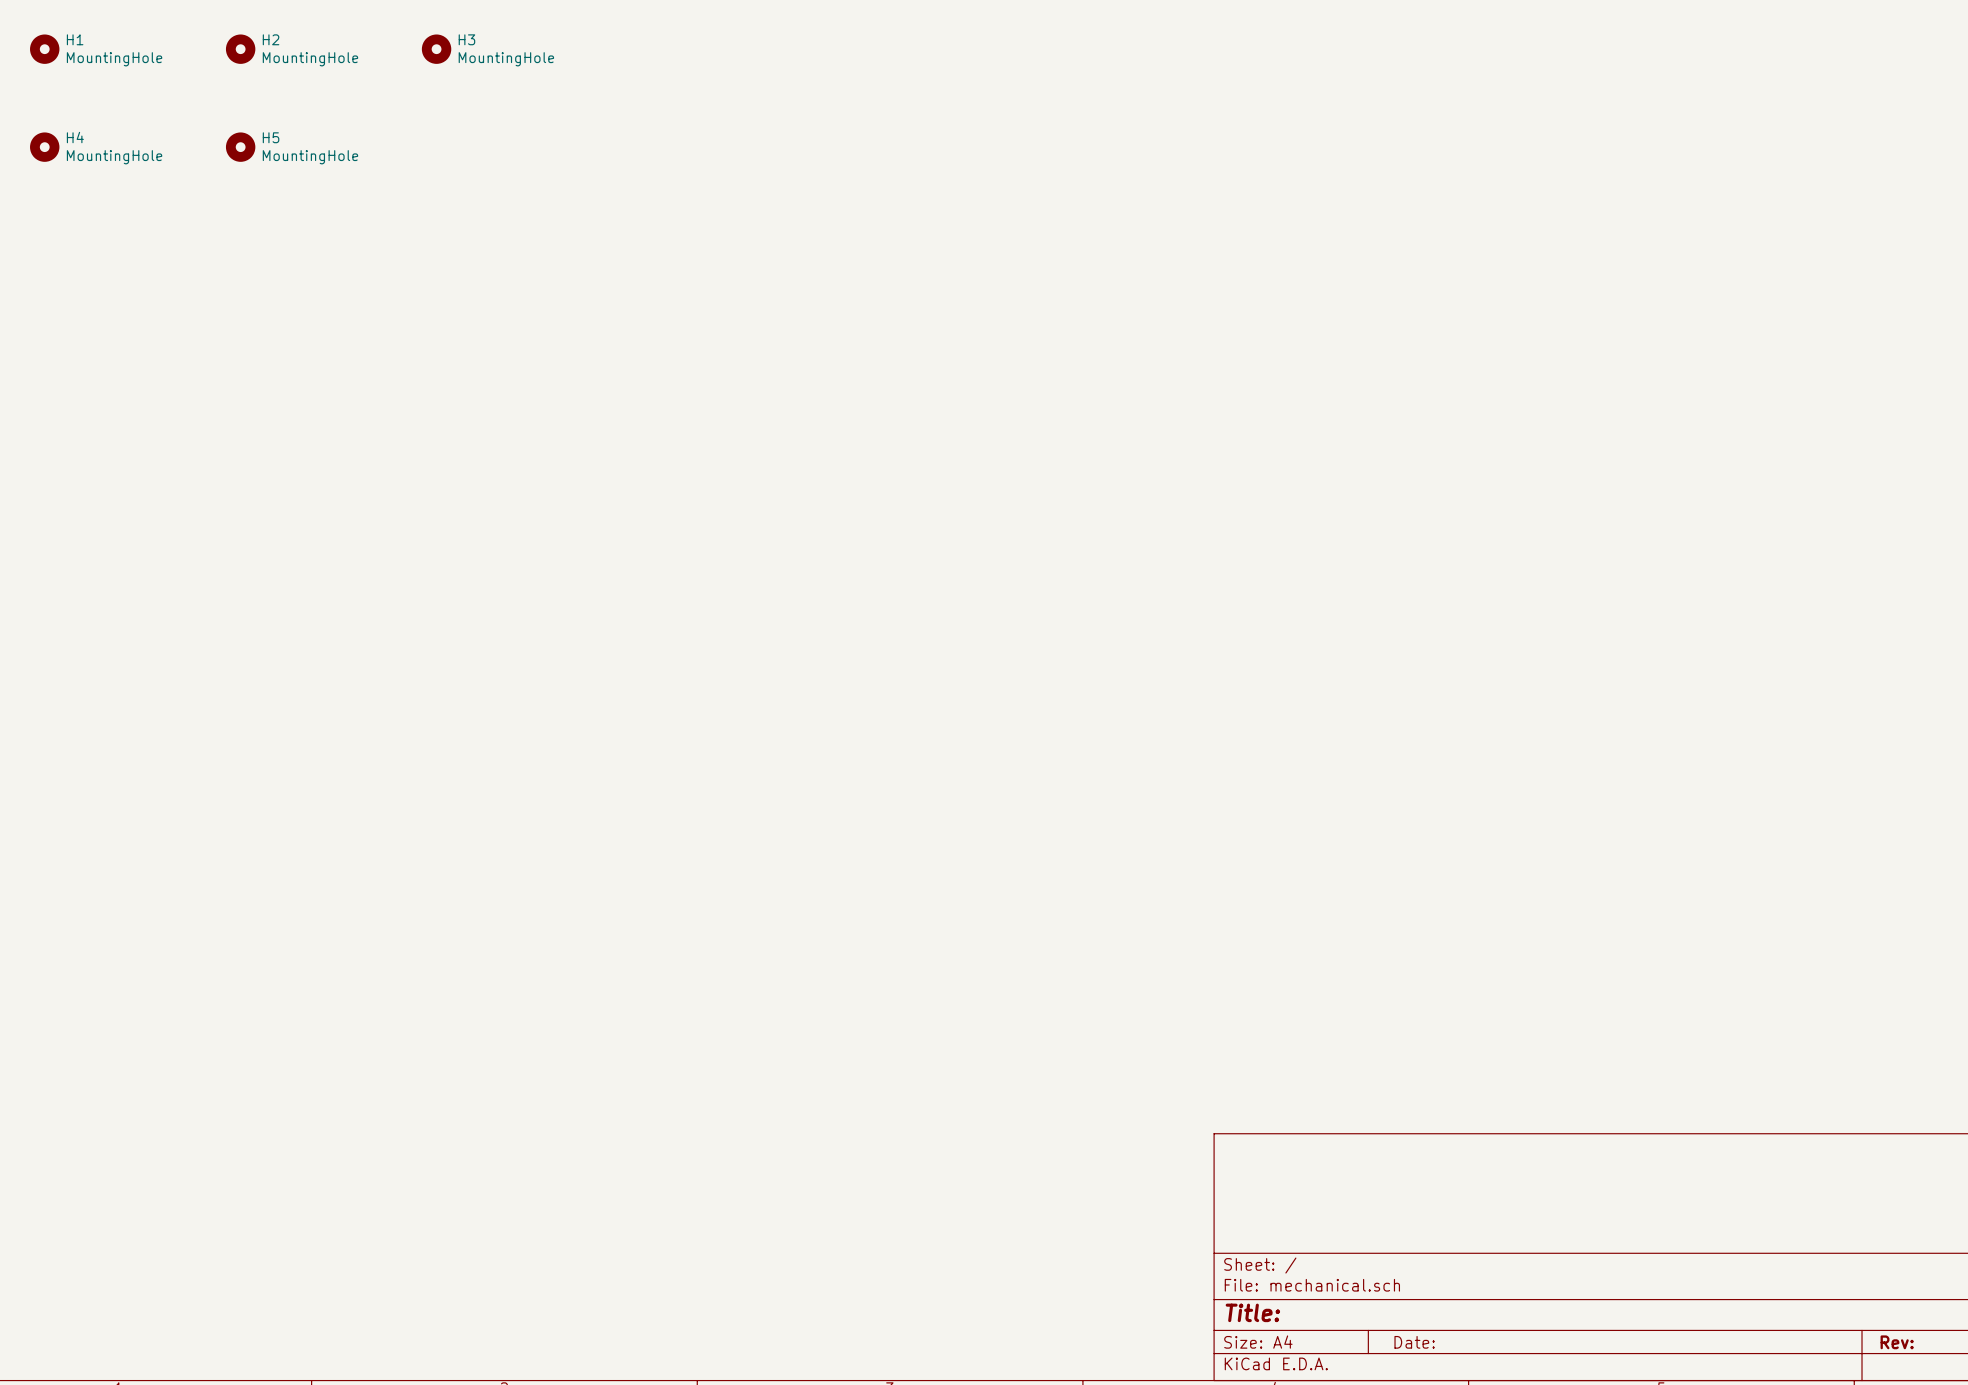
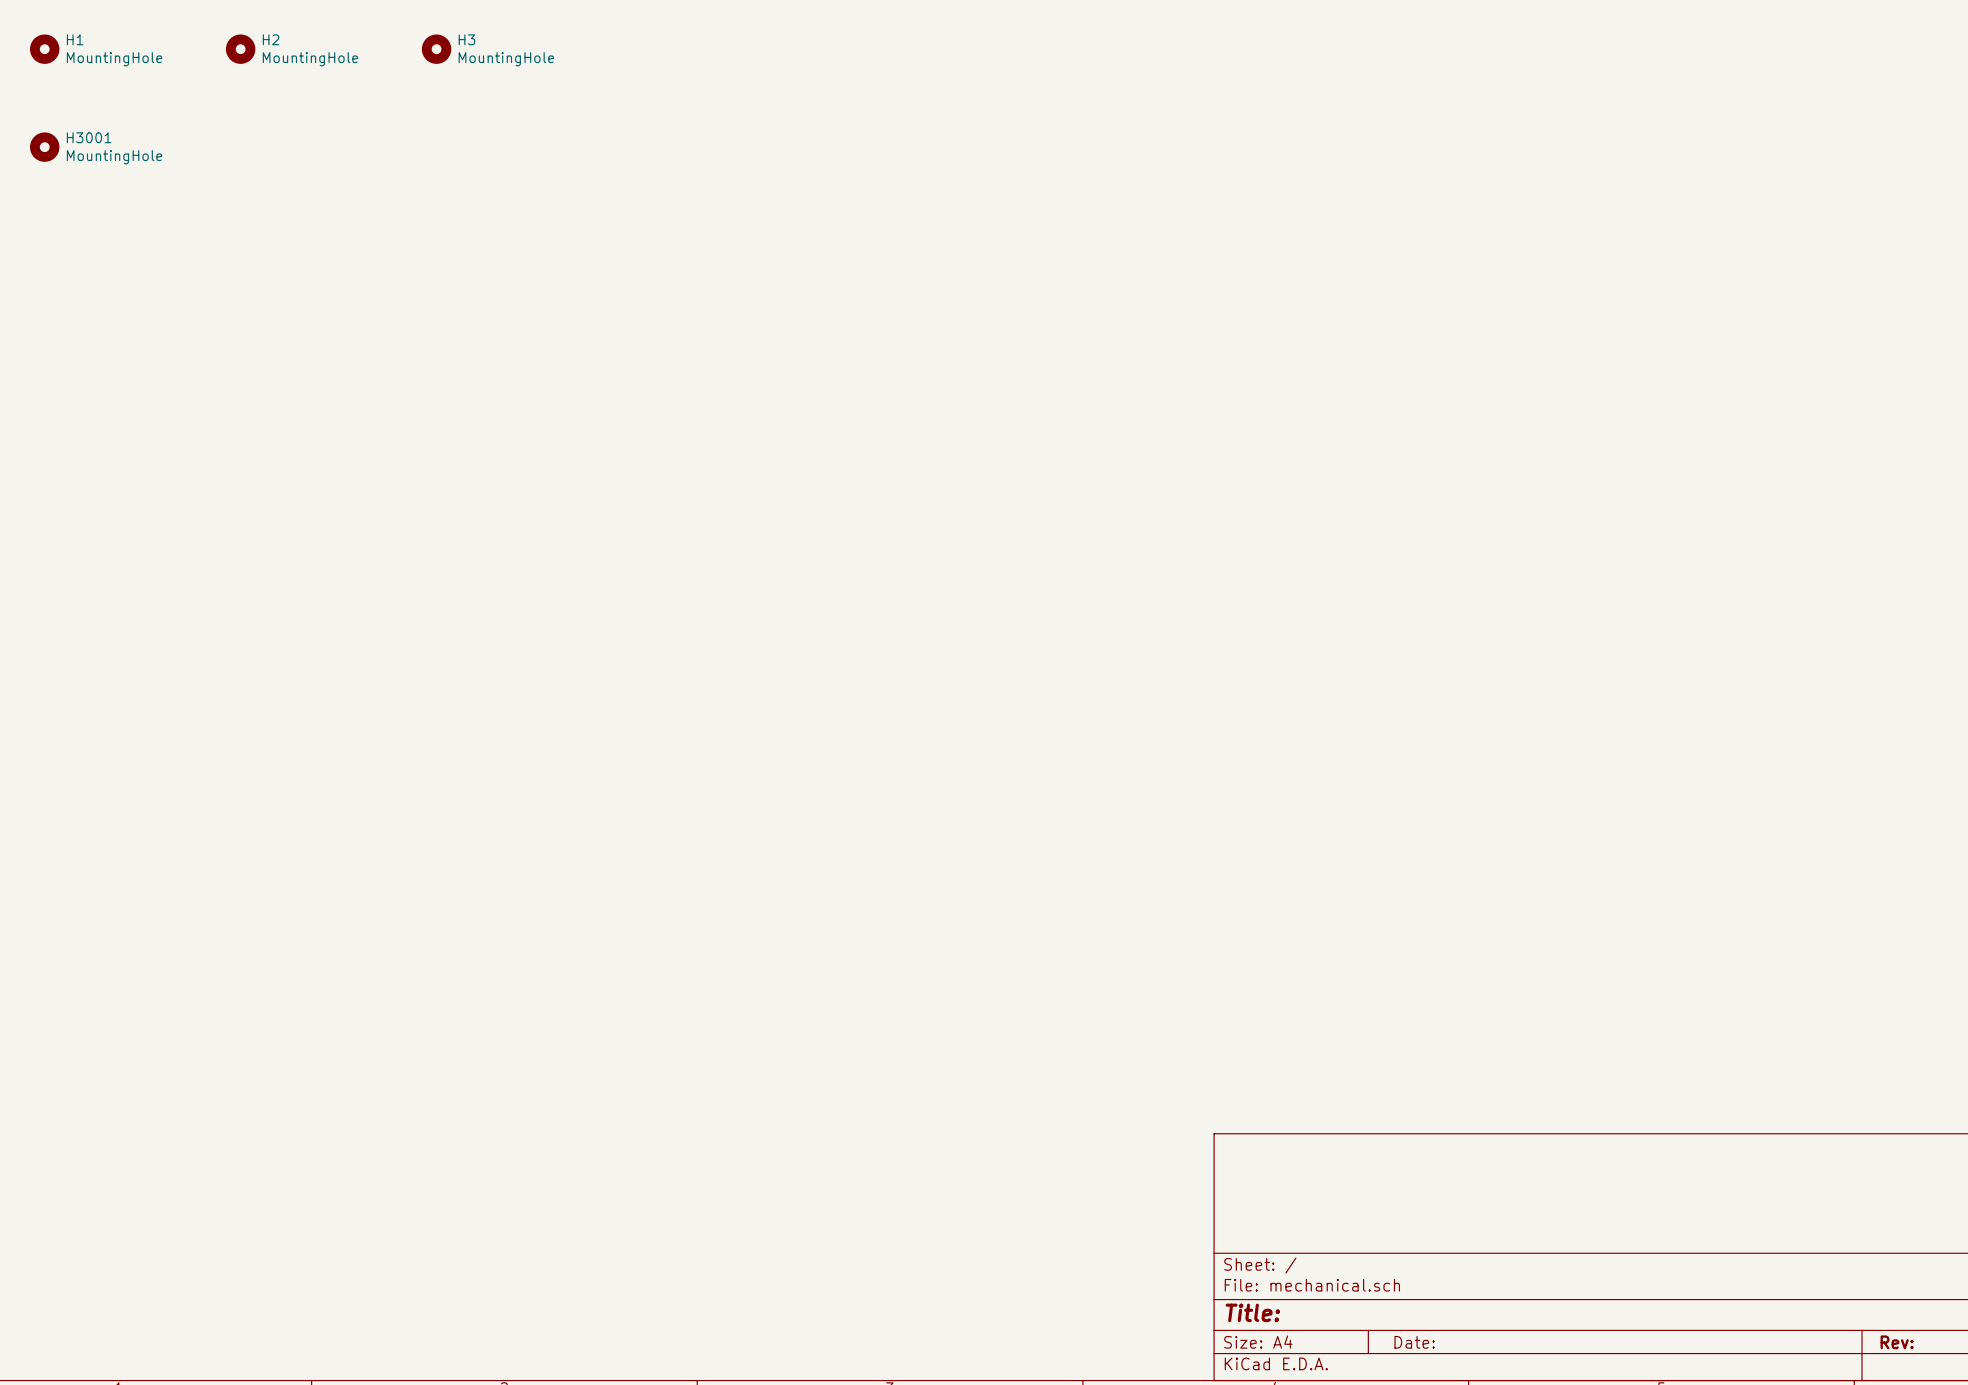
H4 name: H4 (75, 137) -> H3001 (89, 137)
H5: MountingHole (240, 147) -> none

